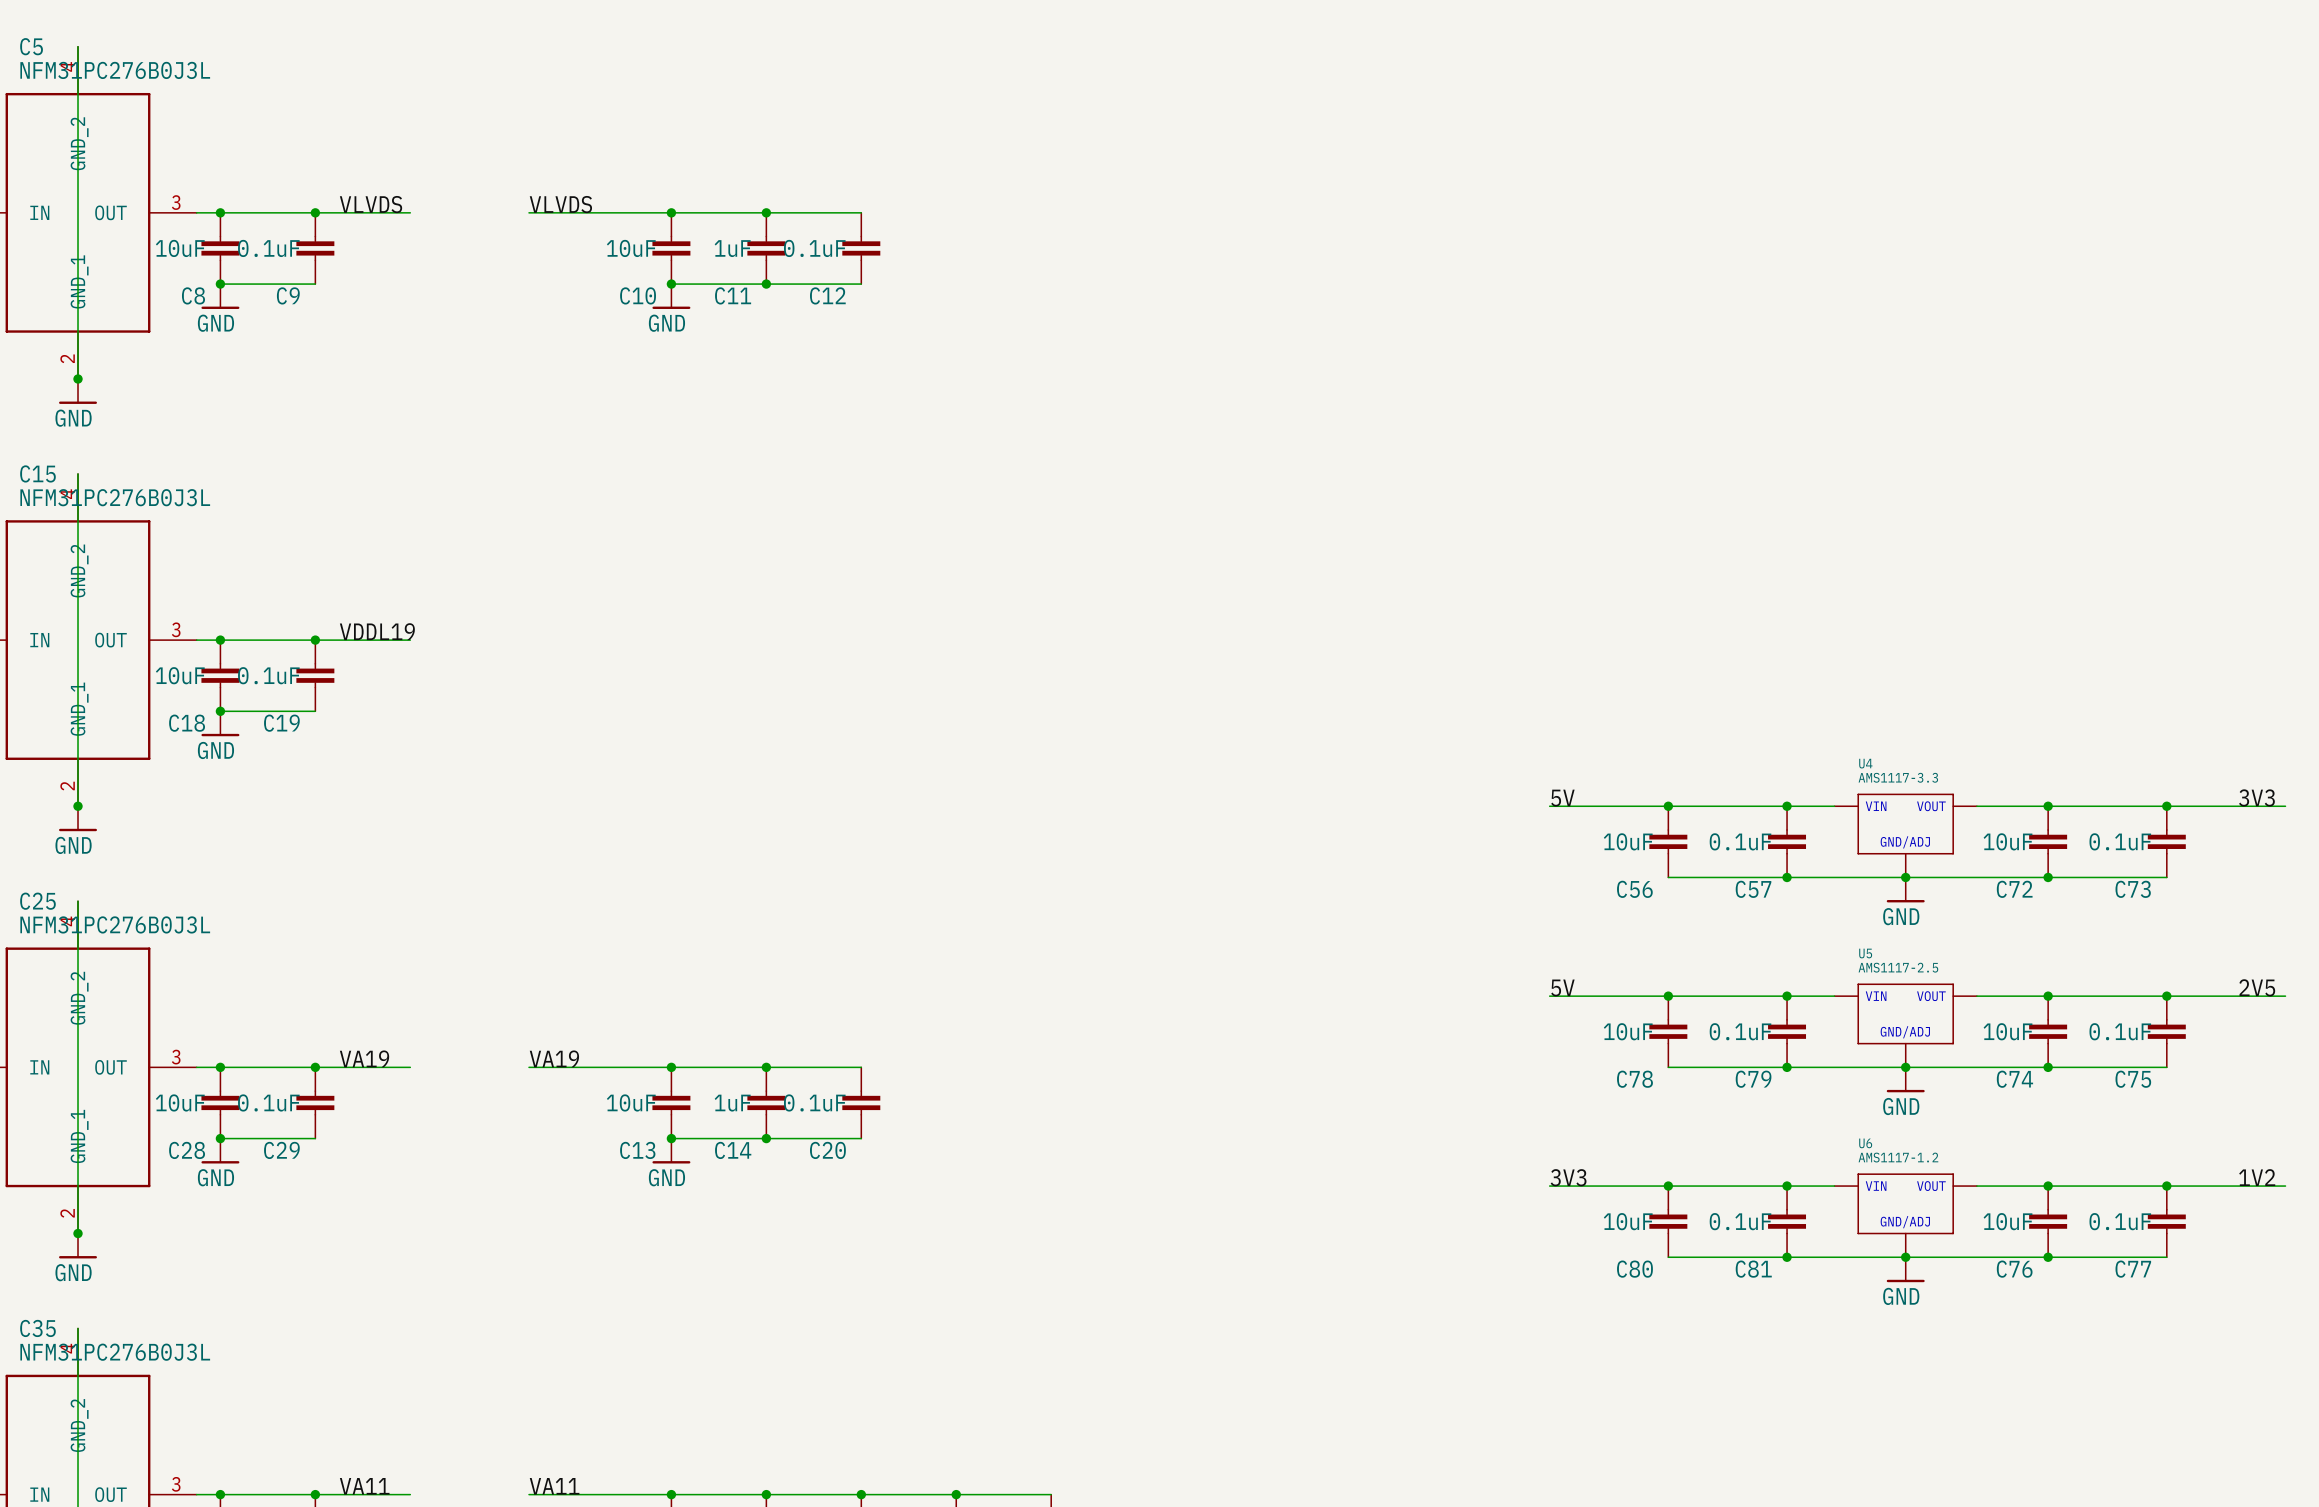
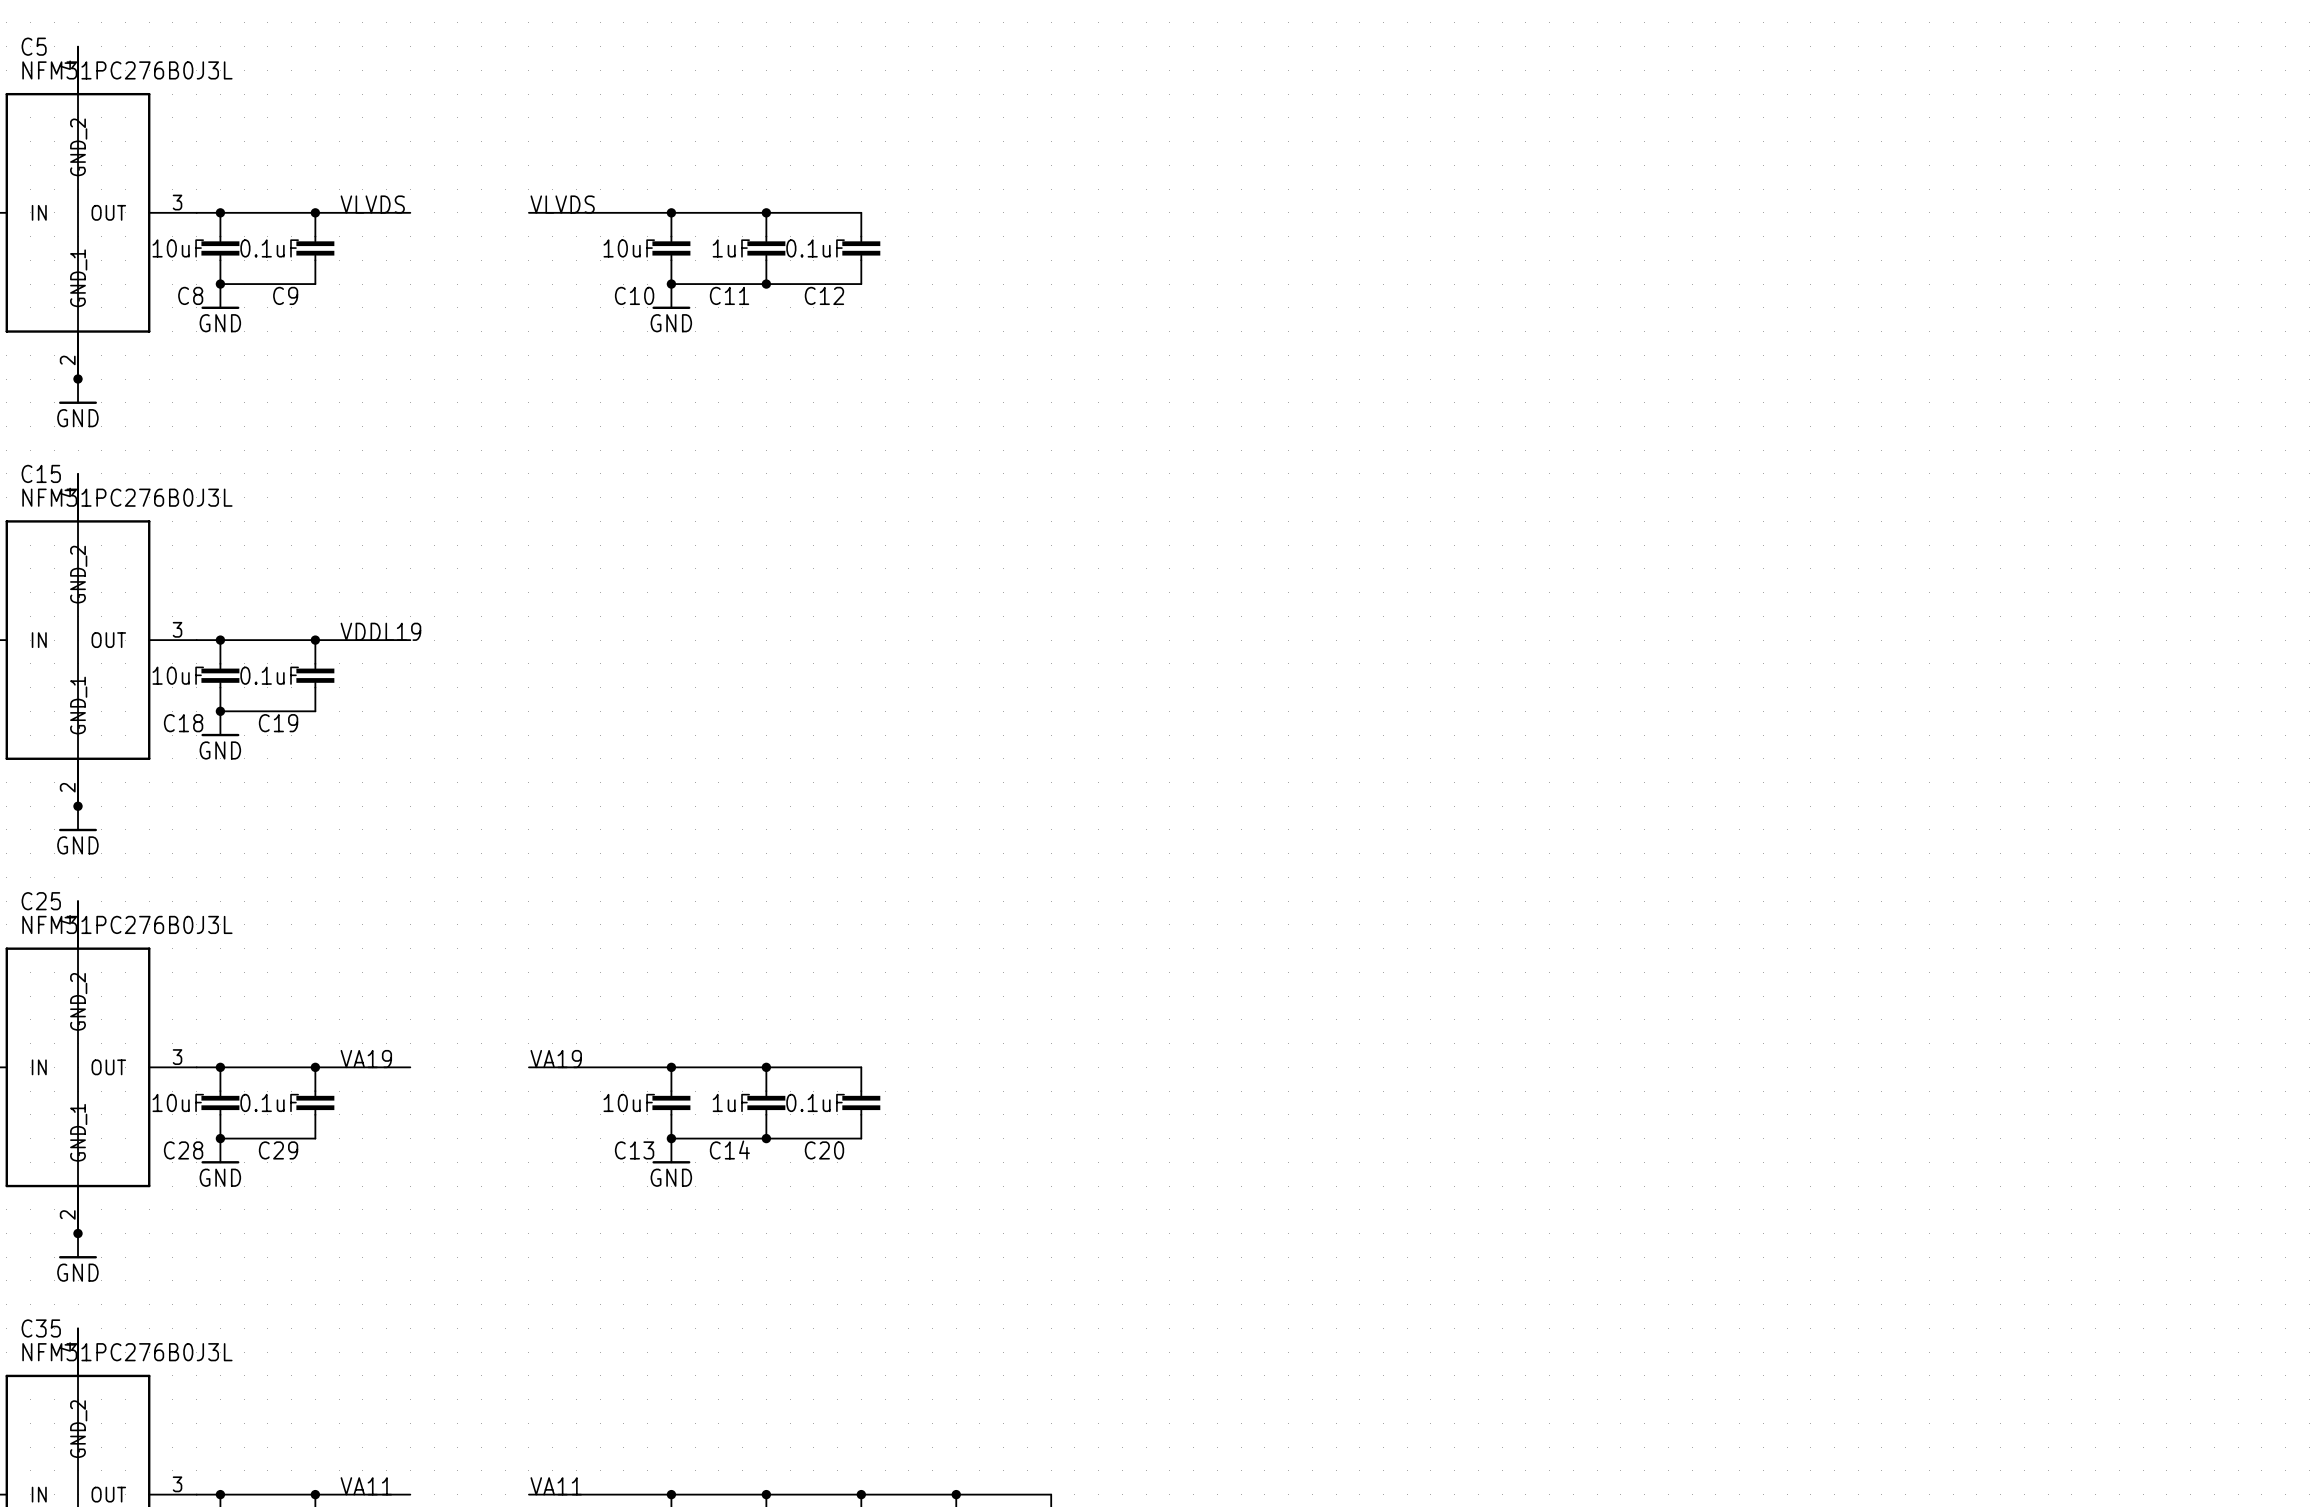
label: 3V3 (2256, 797) -> none
label: 5V (1562, 798) -> none
wire: (1549, 806) (1834, 806) -> none
junction: (1668, 806) -> none
junction: (1787, 806) -> none
wire: (1976, 806) (2285, 806) -> none
junction: (2048, 806) -> none
junction: (2166, 806) -> none
U4: AMS1117-3.3 (1905, 835) -> none
C56: 10uF (1668, 841) -> none
C57: 0.1uF (1787, 841) -> none
C72: 10uF (2048, 841) -> none
C73: 0.1uF (2166, 841) -> none
wire: (1668, 877) (2166, 877) -> none
junction: (1787, 877) -> none
junction: (1905, 877) -> none
junction: (2048, 877) -> none
power symbol: GND (1905, 889) -> none
label: 5V (1562, 987) -> none
label: 2V5 (2257, 987) -> none
wire: (1549, 996) (1834, 996) -> none
junction: (1668, 996) -> none
junction: (1787, 996) -> none
wire: (1976, 996) (2285, 996) -> none
junction: (2048, 996) -> none
junction: (2166, 996) -> none
U5: AMS1117-2.5 (1905, 1025) -> none
C78: 10uF (1668, 1031) -> none
C79: 0.1uF (1787, 1031) -> none
C74: 10uF (2048, 1031) -> none
C75: 0.1uF (2166, 1031) -> none
wire: (1668, 1067) (2166, 1067) -> none
junction: (1787, 1067) -> none
junction: (1905, 1067) -> none
junction: (2048, 1067) -> none
power symbol: GND (1905, 1079) -> none
label: 3V3 (1568, 1177) -> none
label: 1V2 (2257, 1177) -> none
wire: (1549, 1186) (1834, 1186) -> none
junction: (1668, 1186) -> none
junction: (1787, 1186) -> none
wire: (1976, 1186) (2285, 1186) -> none
junction: (2048, 1186) -> none
junction: (2166, 1186) -> none
U6: AMS1117-1.2 (1905, 1215) -> none
C80: 10uF (1668, 1221) -> none
C81: 0.1uF (1787, 1221) -> none
C76: 10uF (2048, 1221) -> none
C77: 0.1uF (2166, 1221) -> none
wire: (1668, 1257) (2166, 1257) -> none
junction: (1787, 1257) -> none
junction: (1905, 1257) -> none
junction: (2048, 1257) -> none
power symbol: GND (1905, 1269) -> none

